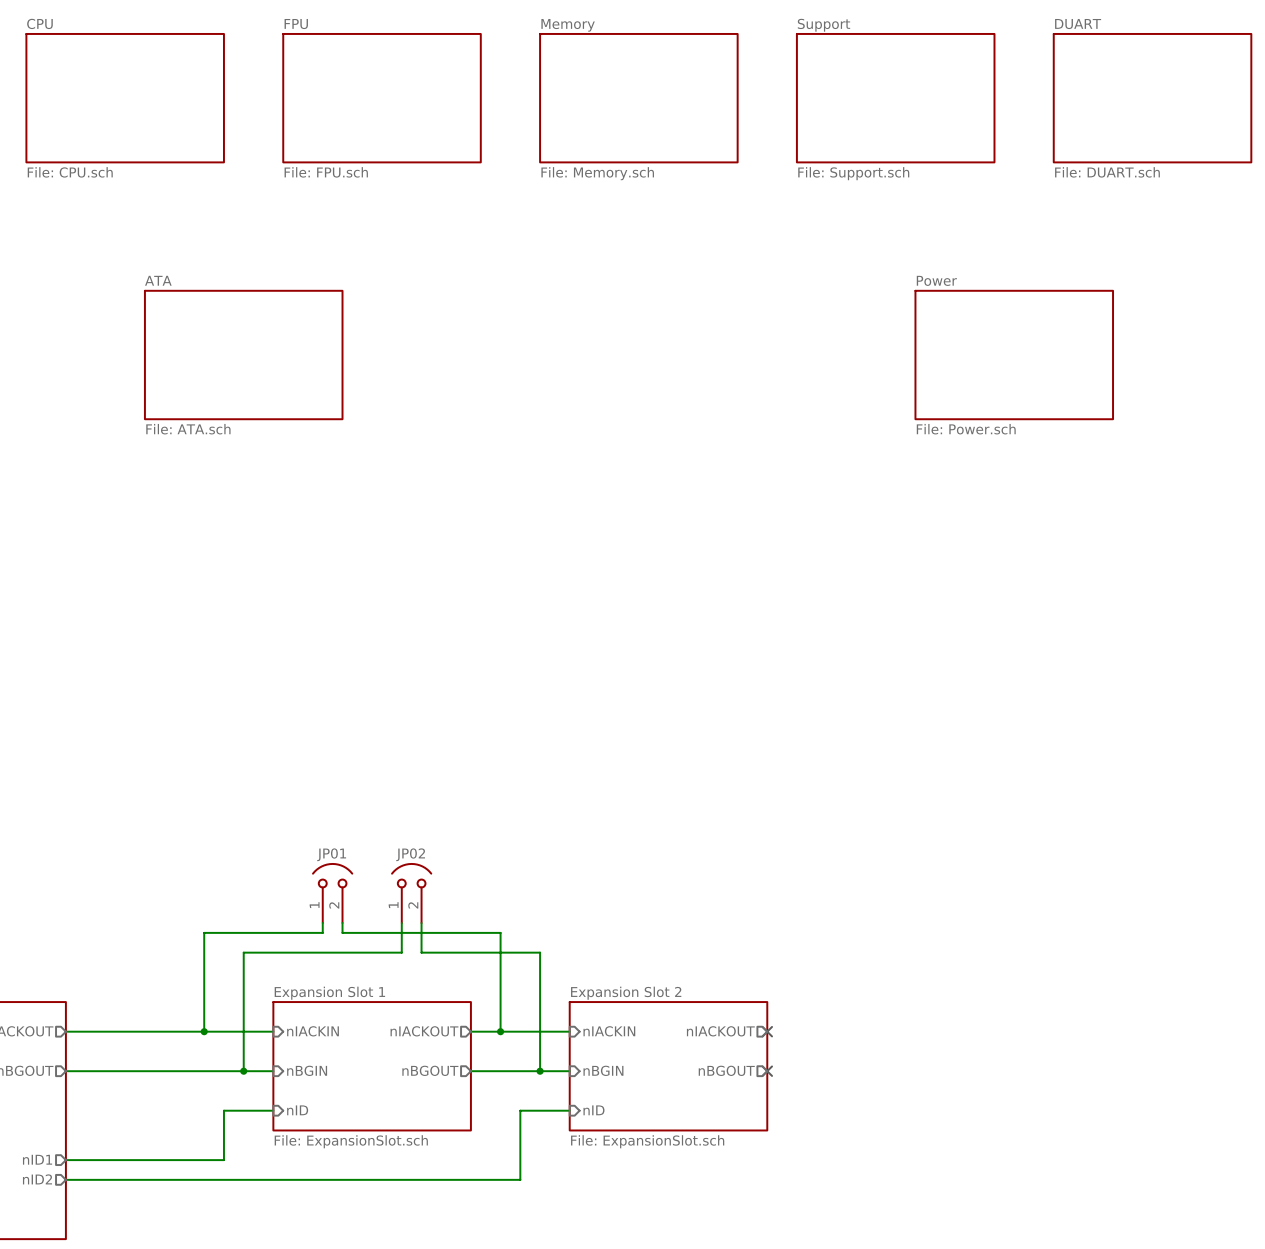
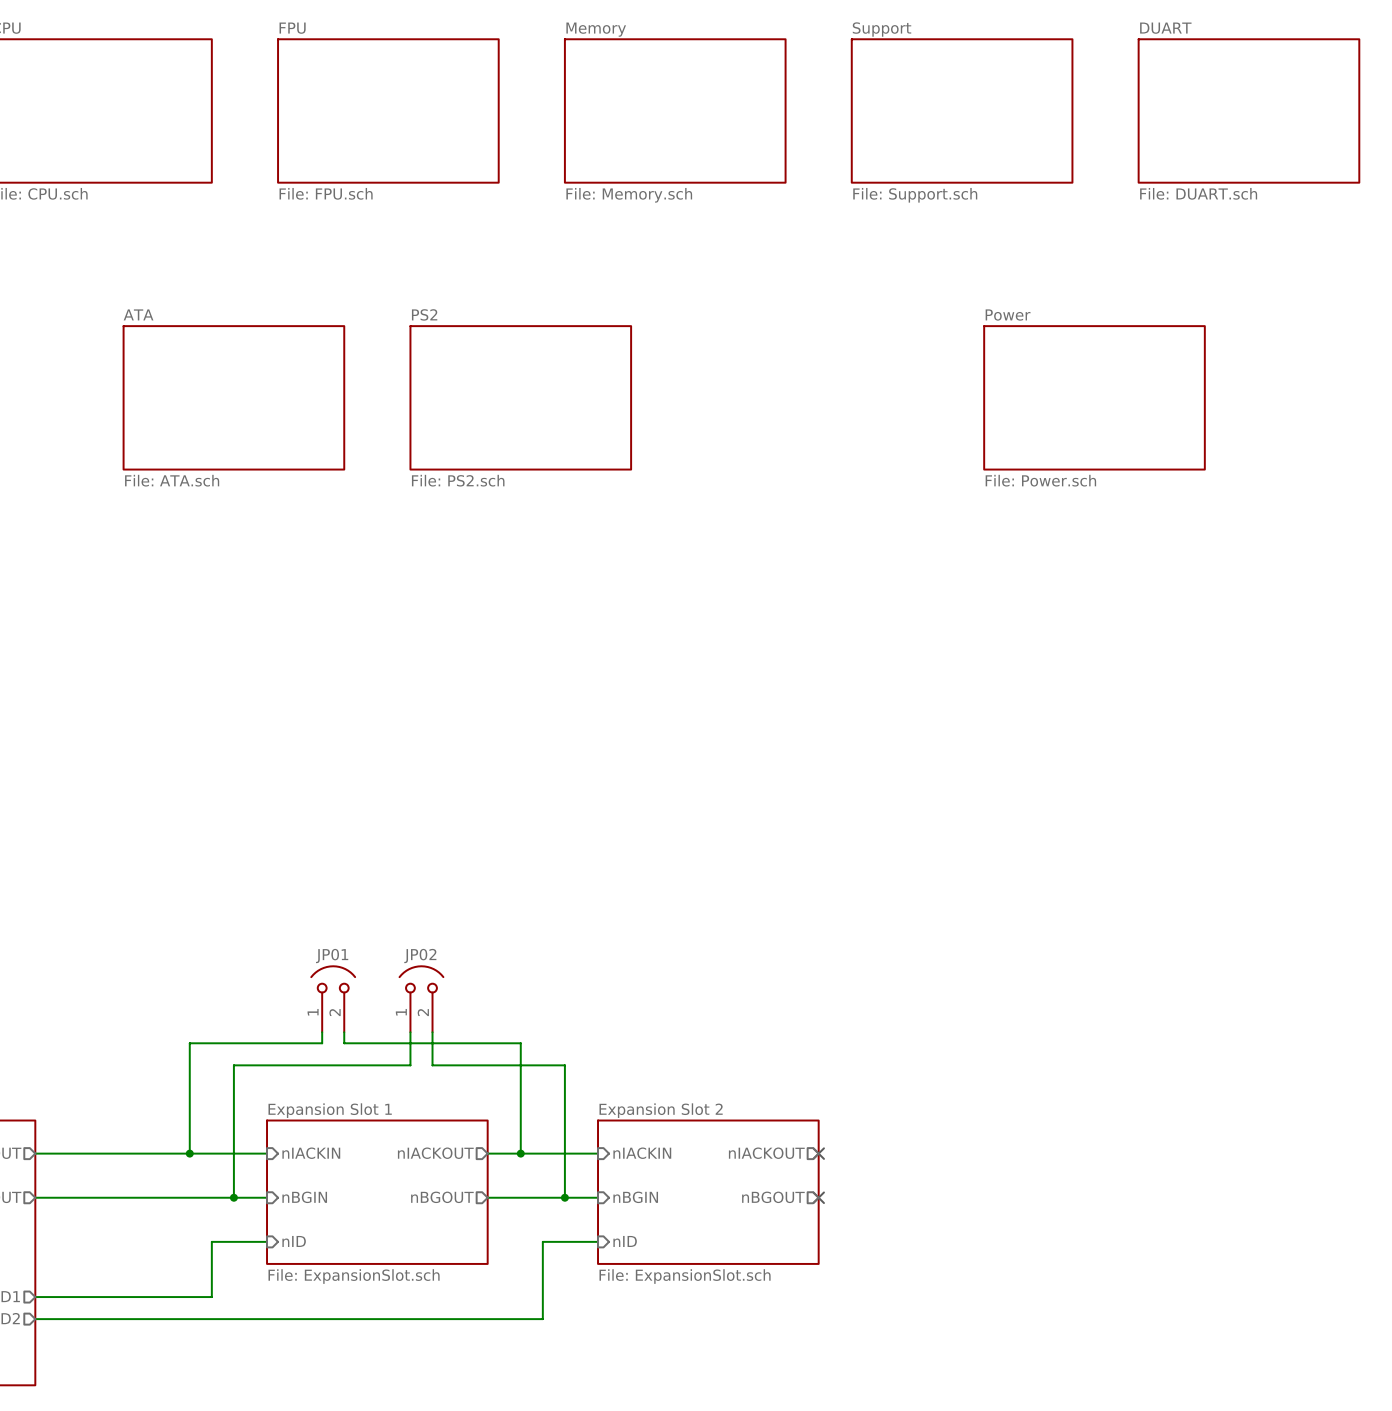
sheet PS2: none -> File: PS2.sch (520, 397)

